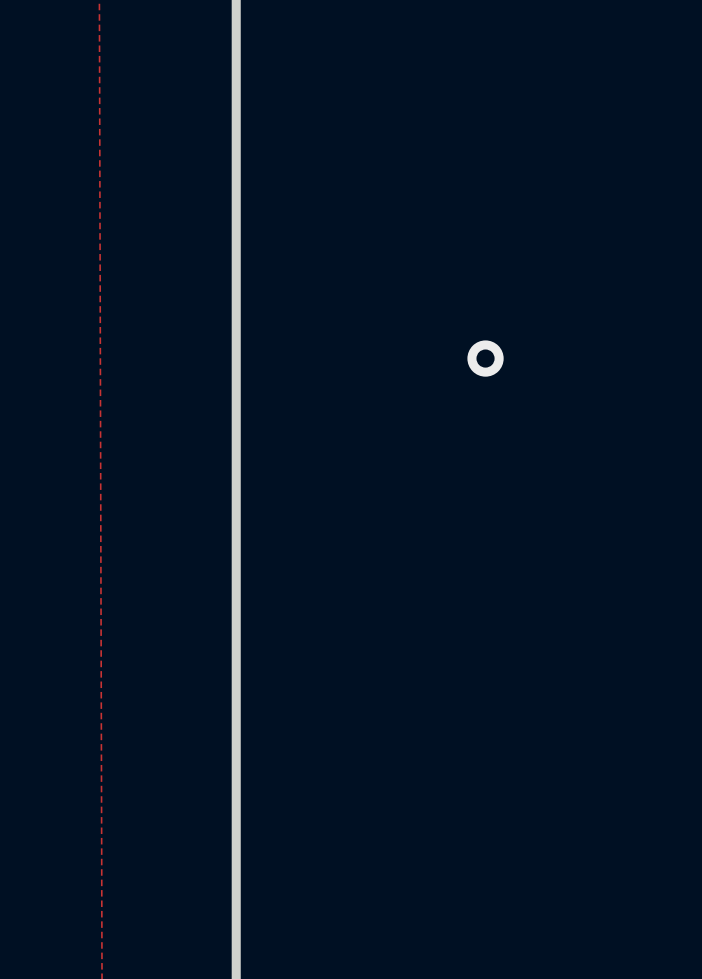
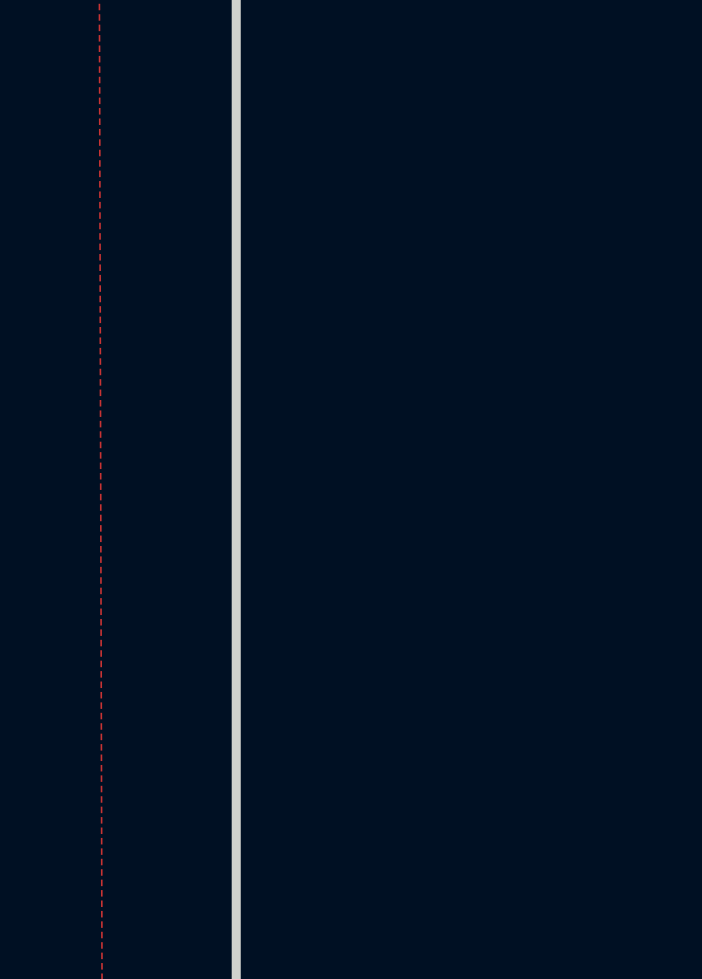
via: (485, 358) -> none

